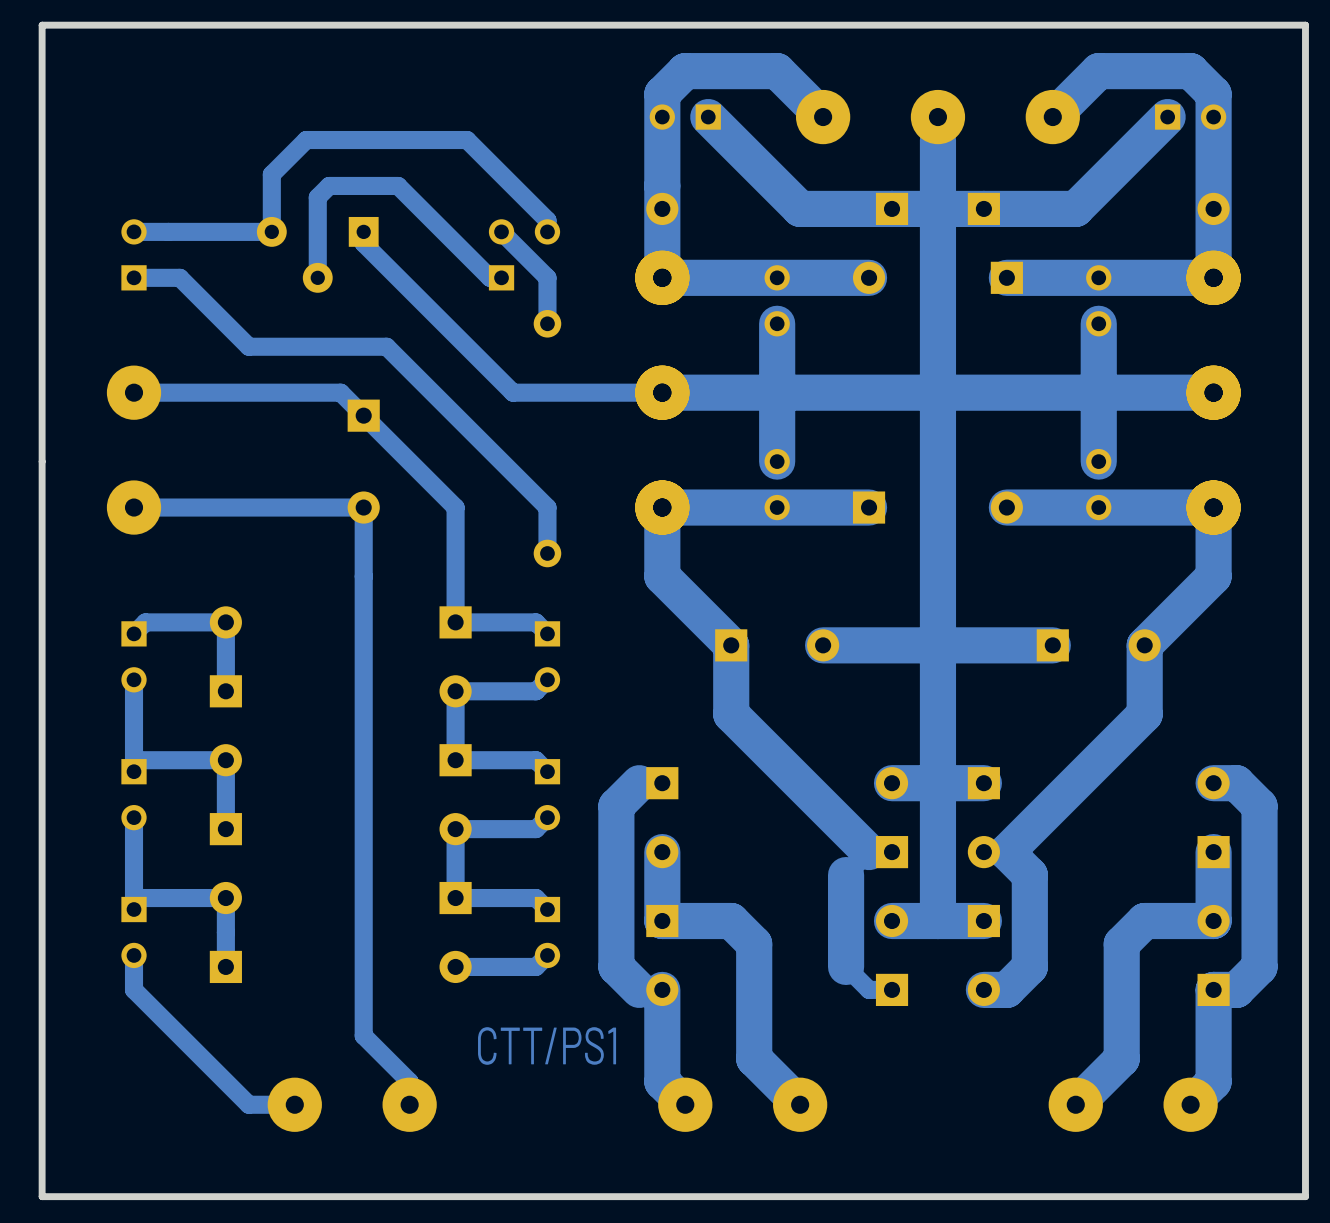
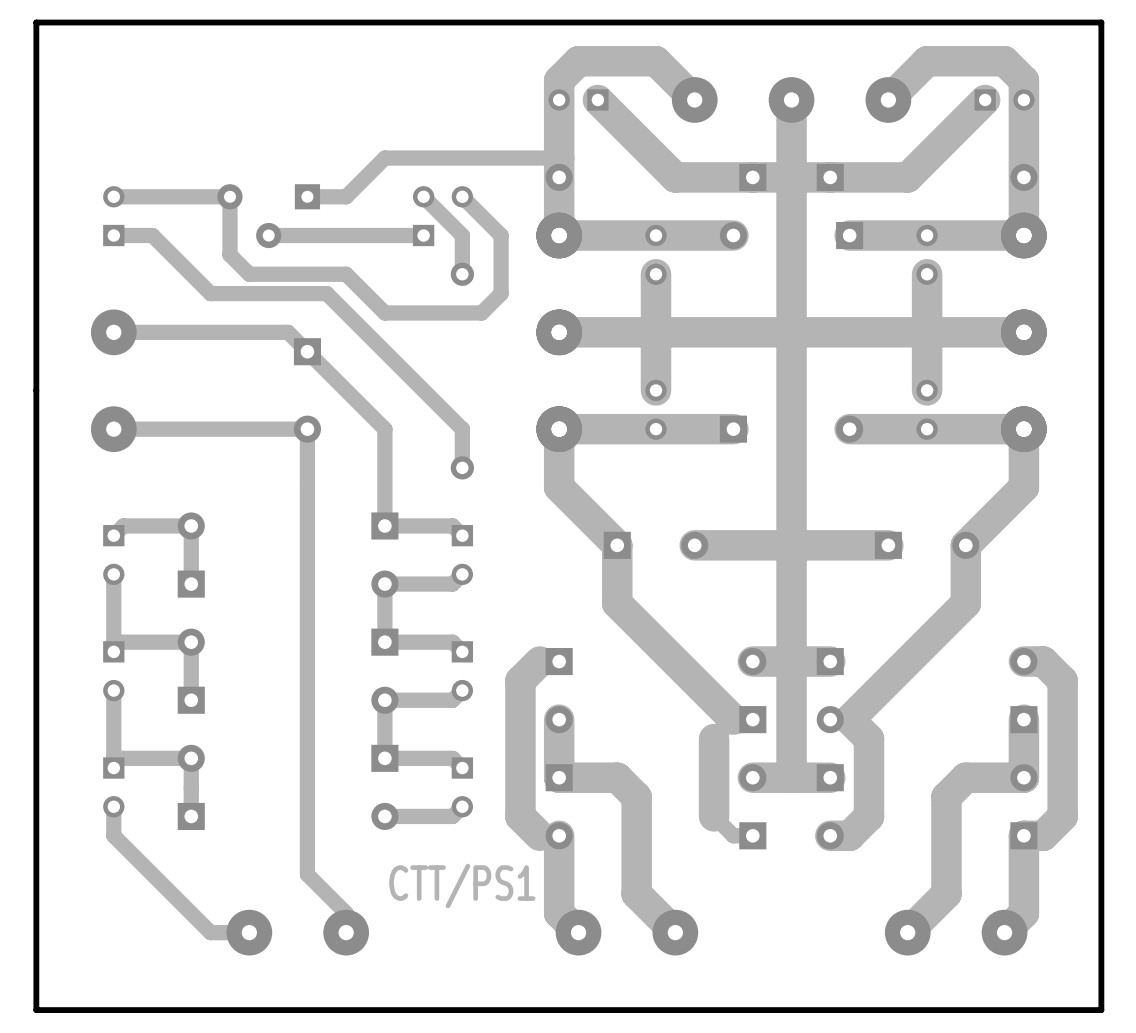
track: (363, 231) (363, 243) (513, 392) (662, 392) -> (307, 196) (346, 196) (384, 158) (559, 158)
track: (547, 231) (547, 220) (467, 140) (306, 140) (271, 174) (271, 231) -> (462, 196) (501, 235) (501, 293) (481, 312) (384, 312) (346, 274) (249, 274) (229, 254) (229, 196)
track: (490, 277) (398, 185) (329, 185) (317, 197) (317, 277) -> (413, 235) (268, 235)

